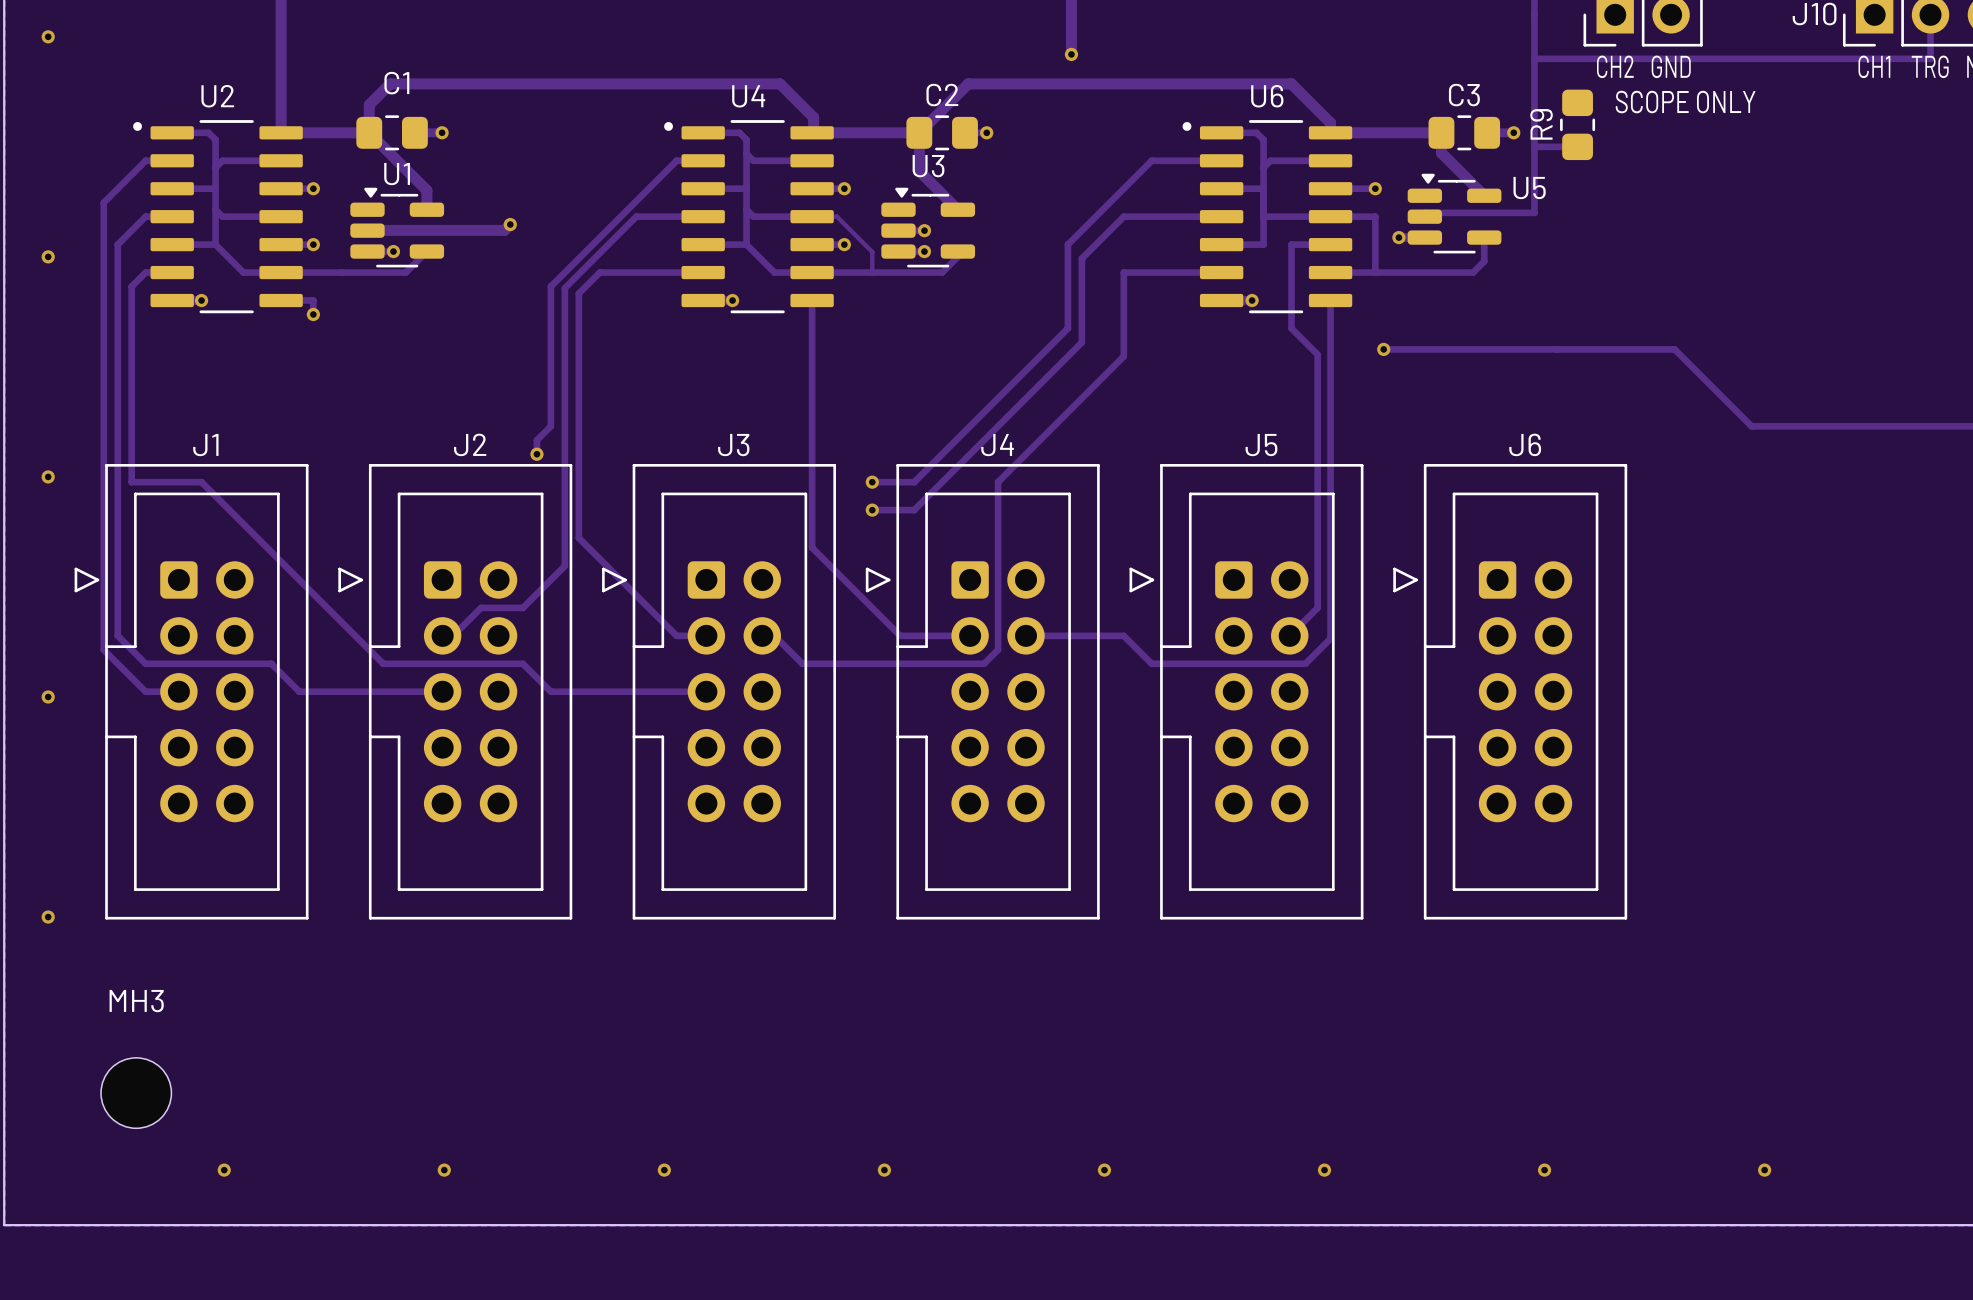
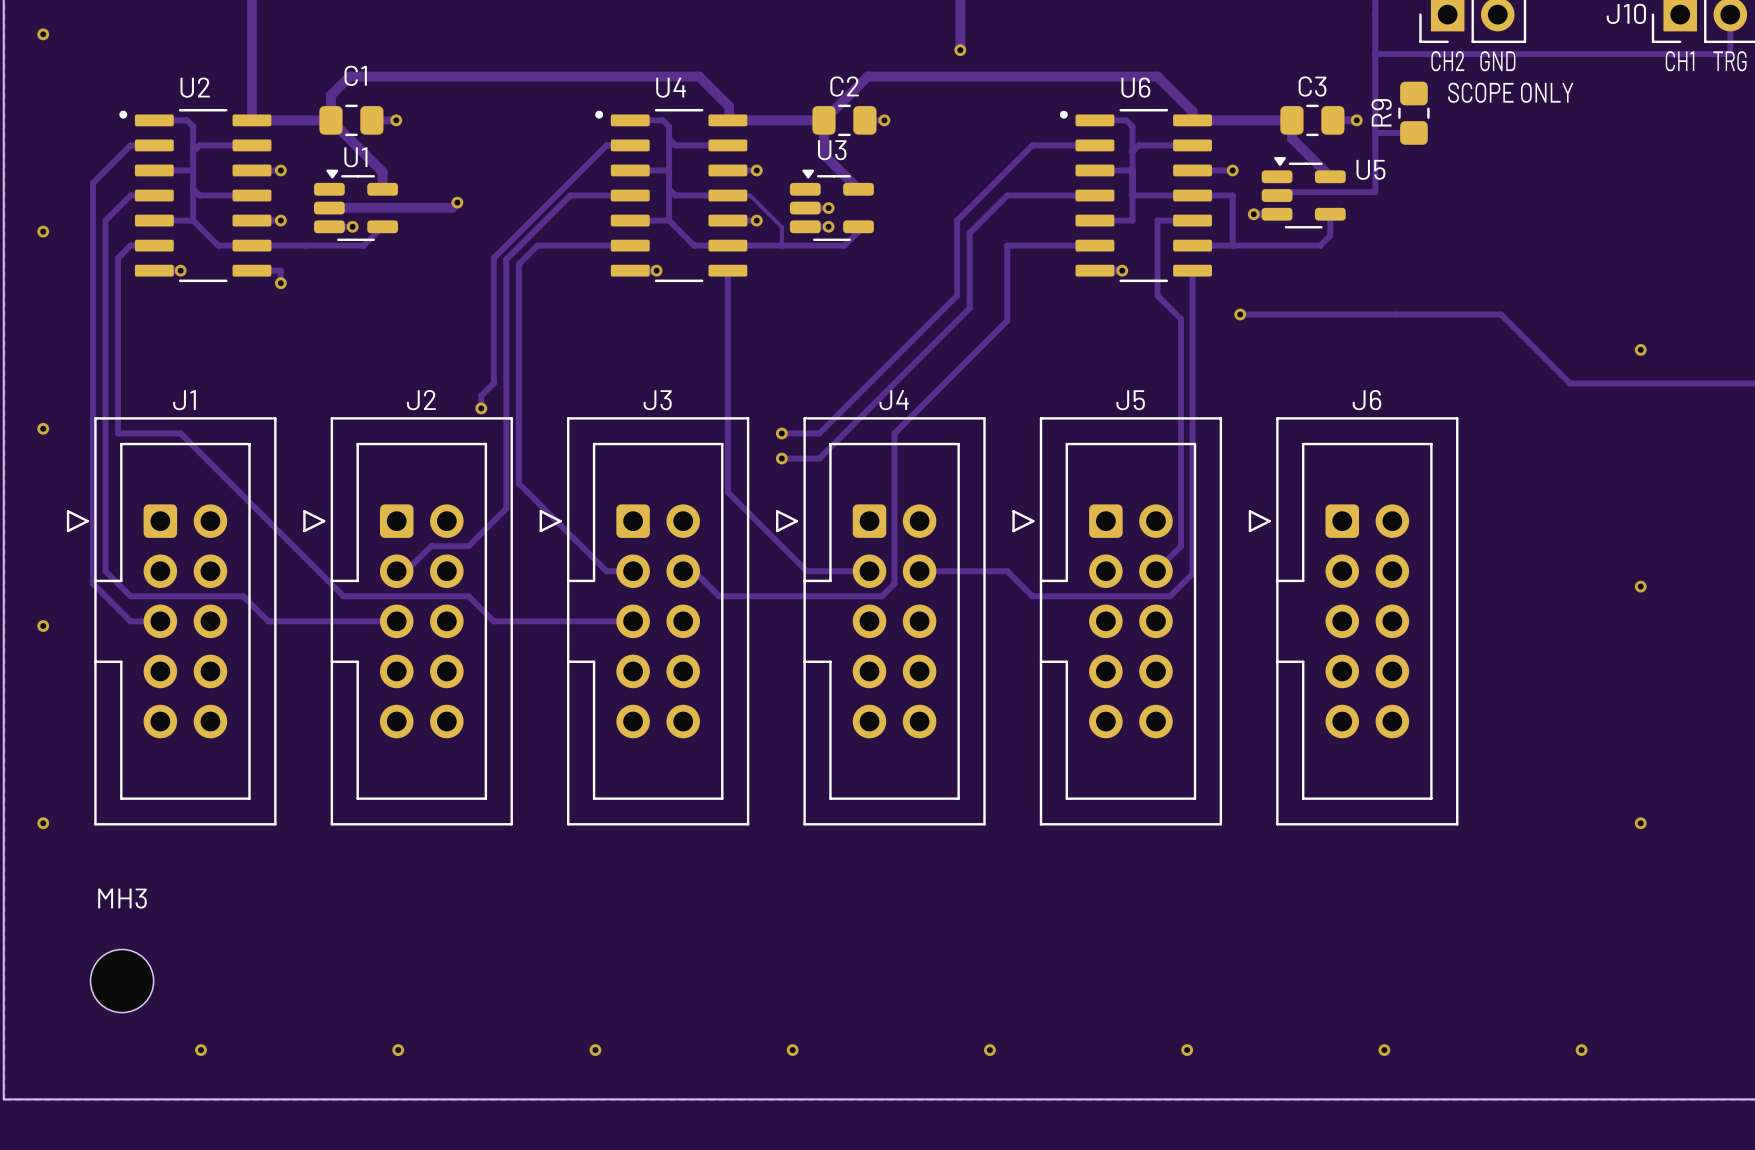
via: none -> (1640, 349)
via: none -> (1640, 586)
via: none -> (1640, 823)

